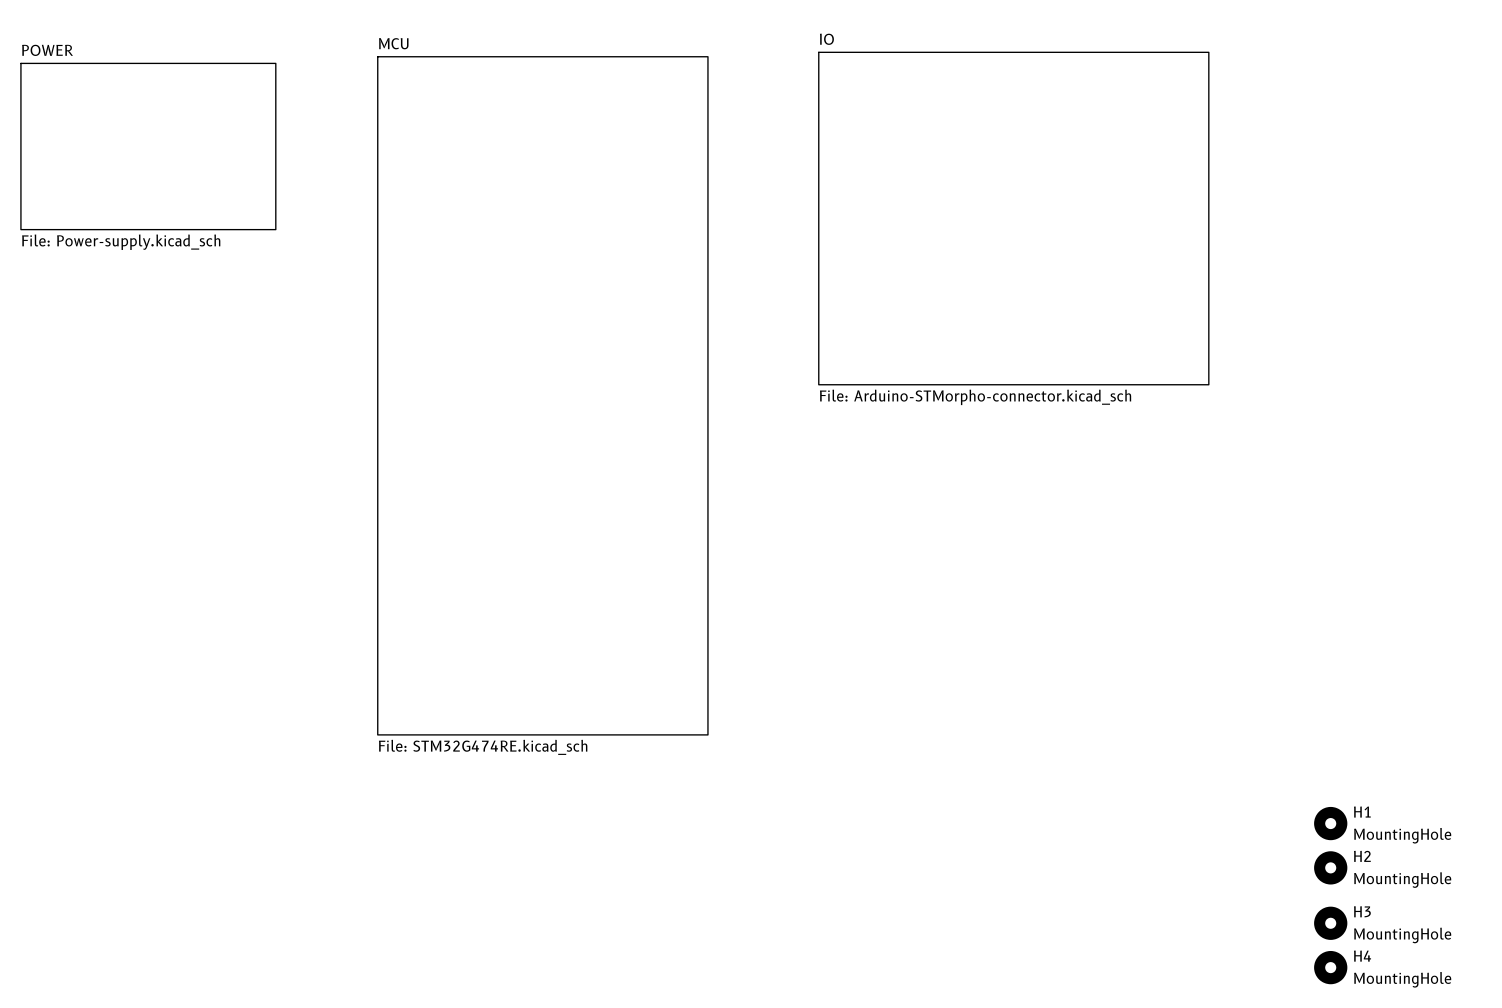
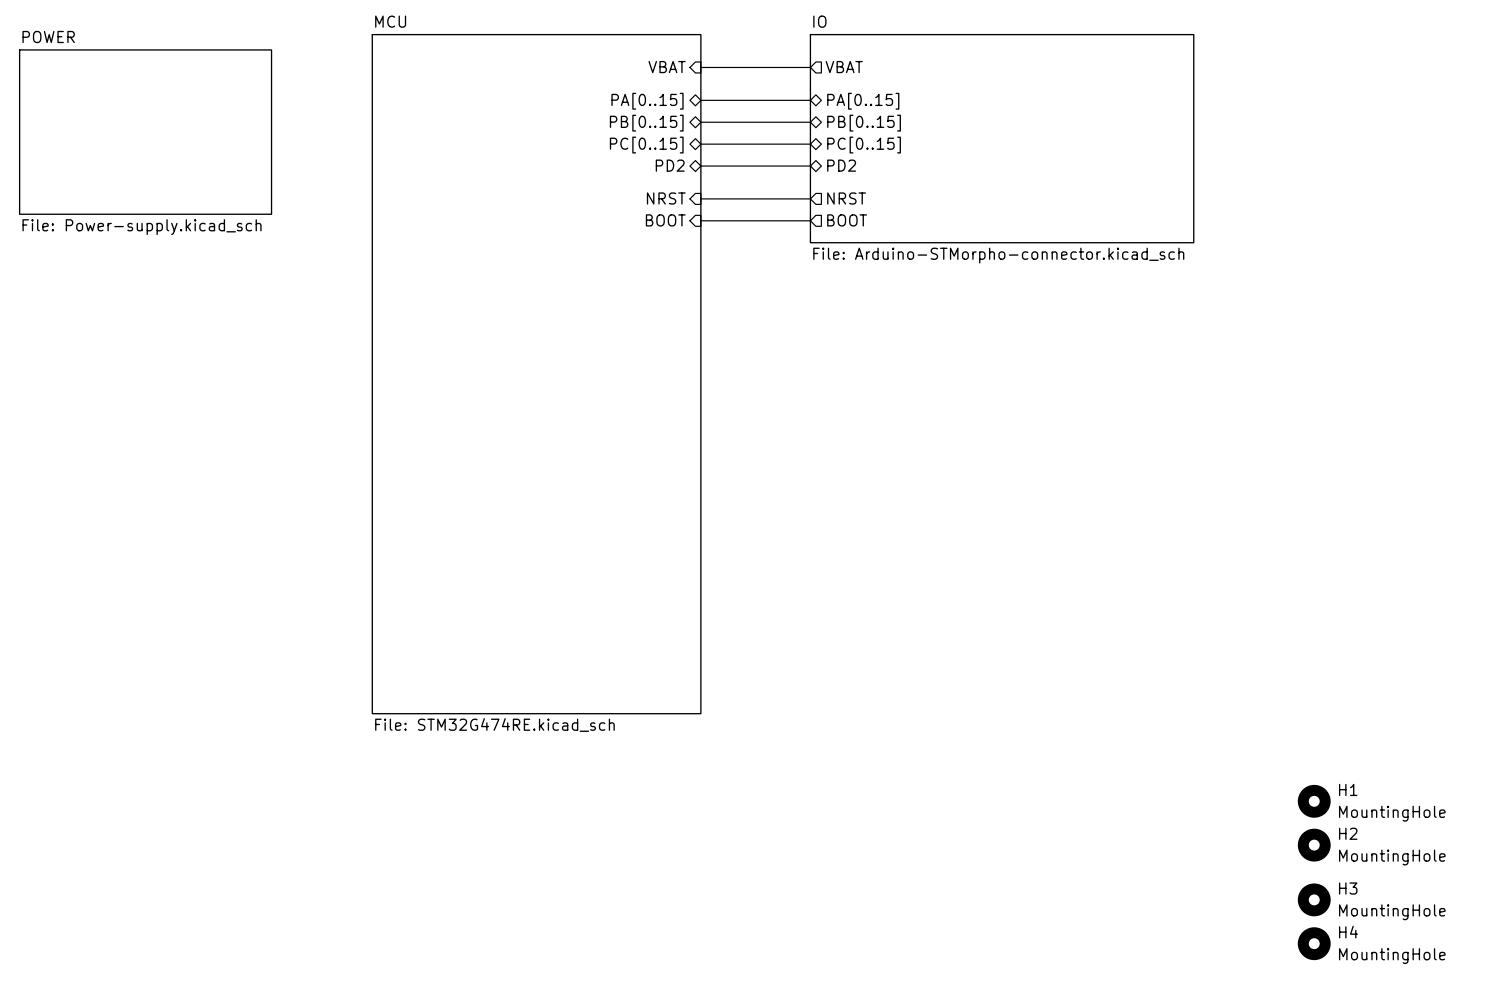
sheet MCU shape: [377, 56, 709, 736] -> [371, 33, 702, 715]
sheet pin: none -> VBAT (667, 67)
sheet pin: none -> VBAT (844, 67)
wire: none -> (700, 67) (810, 67)
bus: none -> (700, 100) (810, 100)
sheet pin: none -> PA[0..15] (647, 101)
sheet pin: none -> PA[0..15] (863, 101)
bus: none -> (700, 122) (810, 122)
sheet pin: none -> PB[0..15] (646, 123)
sheet pin: none -> PB[0..15] (864, 123)
sheet IO: none -> File: Arduino-STMorpho-connector.kicad_sch (1002, 138)
bus: none -> (700, 144) (810, 144)
sheet pin: none -> PC[0..15] (646, 145)
sheet pin: none -> PC[0..15] (864, 145)
sheet pin: none -> PD2 (670, 165)
wire: none -> (700, 166) (810, 166)
sheet pin: none -> PD2 (841, 165)
sheet pin: none -> NRST (666, 198)
sheet pin: none -> NRST (846, 198)
wire: none -> (700, 198) (810, 198)
sheet IO: File: Arduino-STMorpho-connector.kicad_sch (1013, 218) -> none
sheet pin: none -> BOOT (665, 220)
sheet pin: none -> BOOT (847, 220)
wire: none -> (700, 220) (810, 220)

